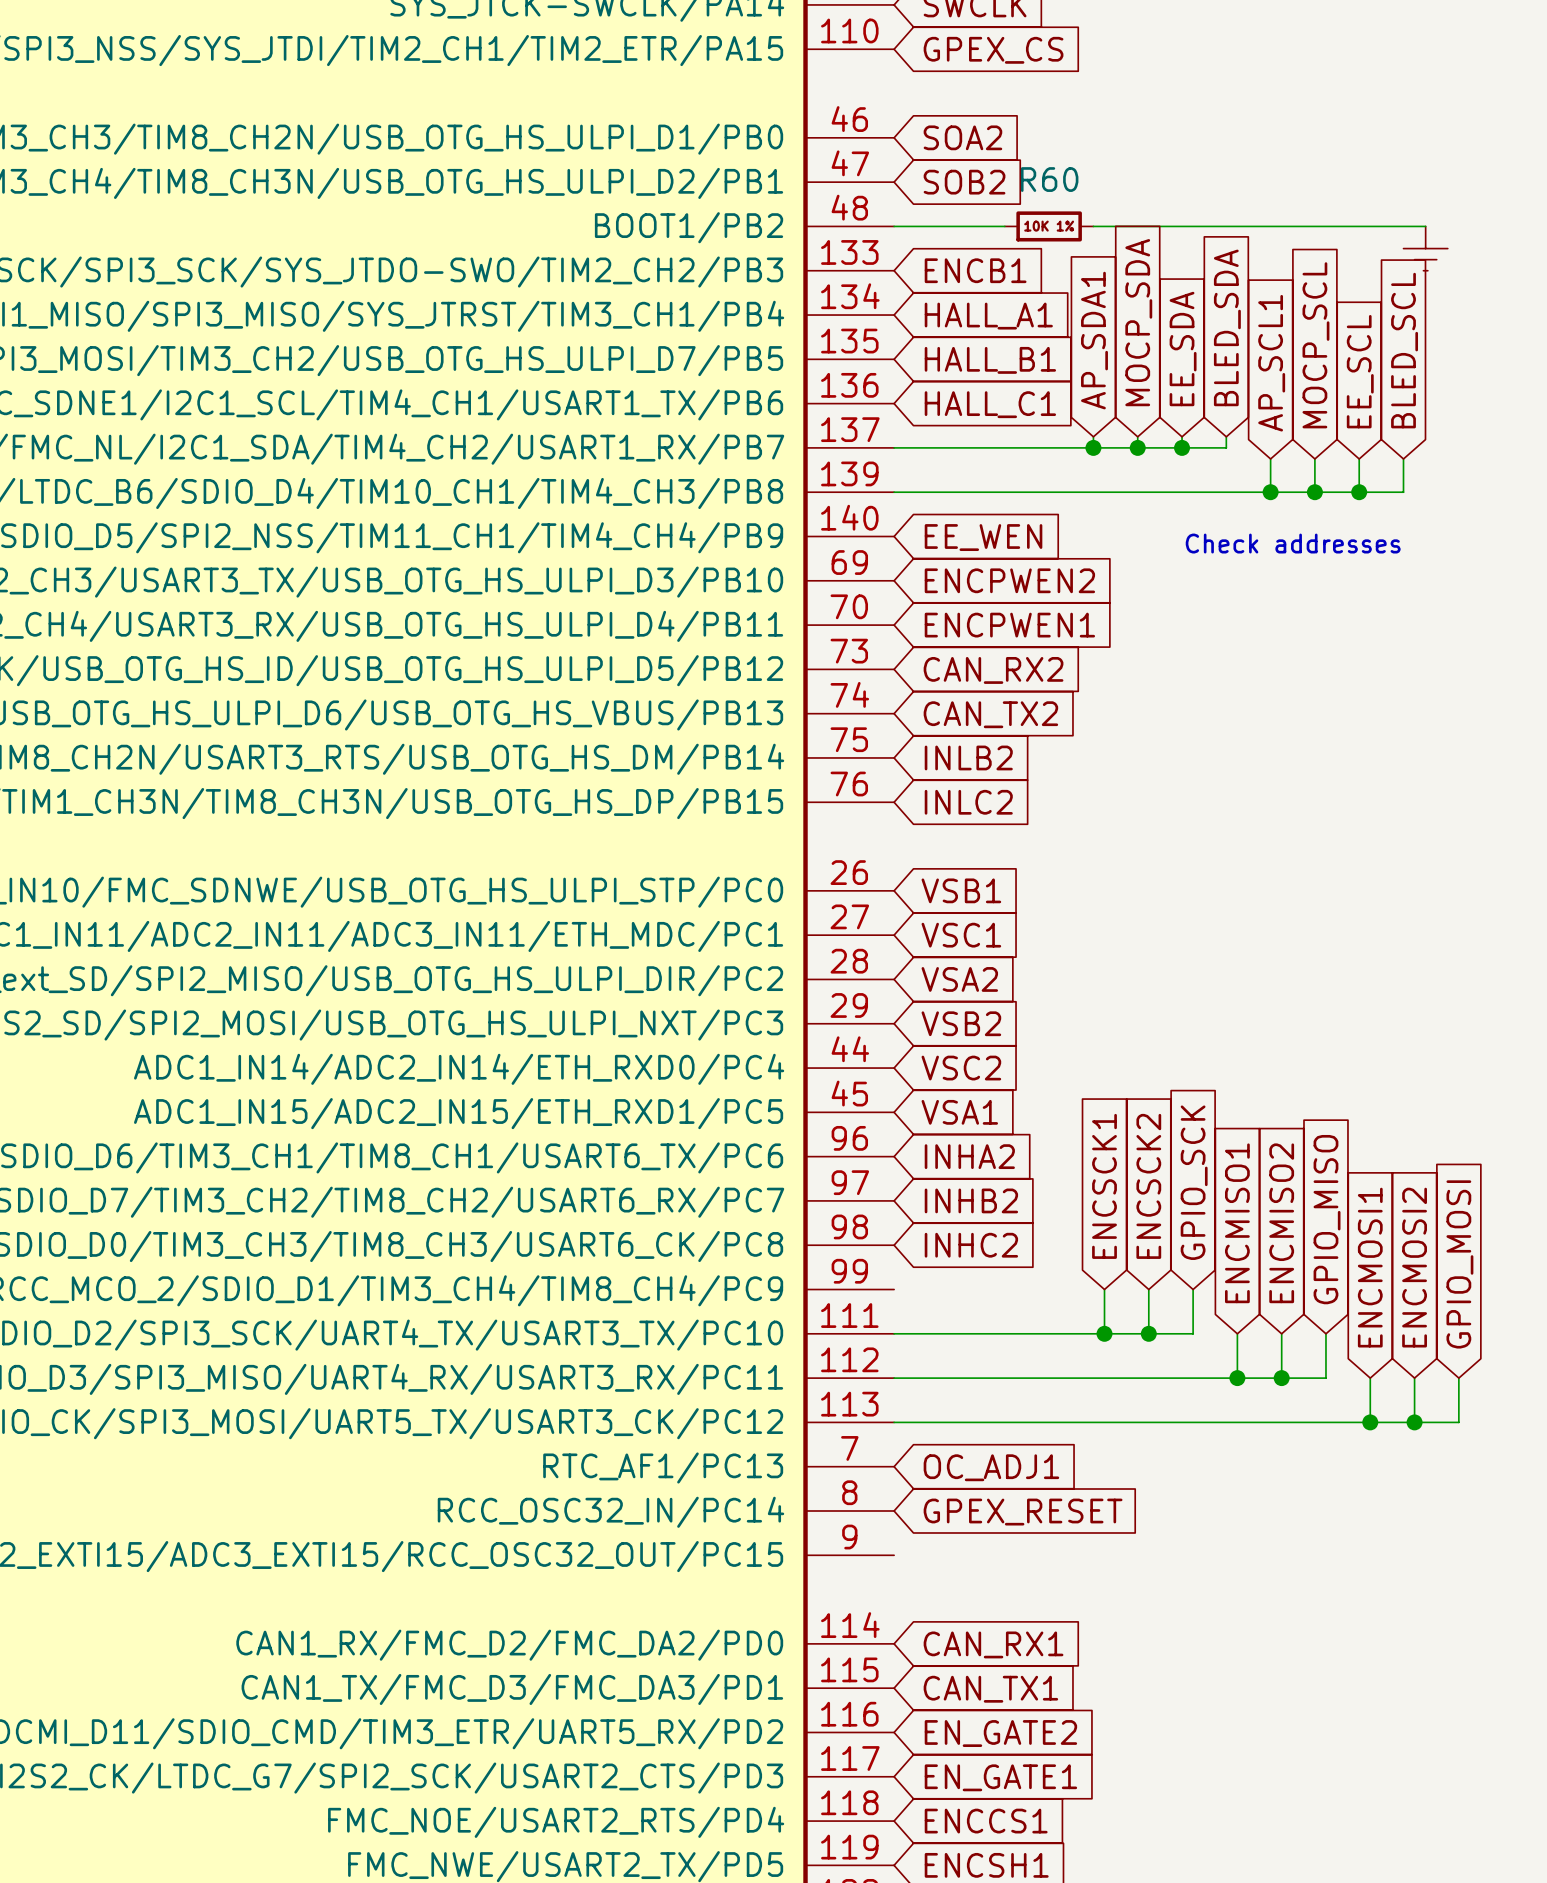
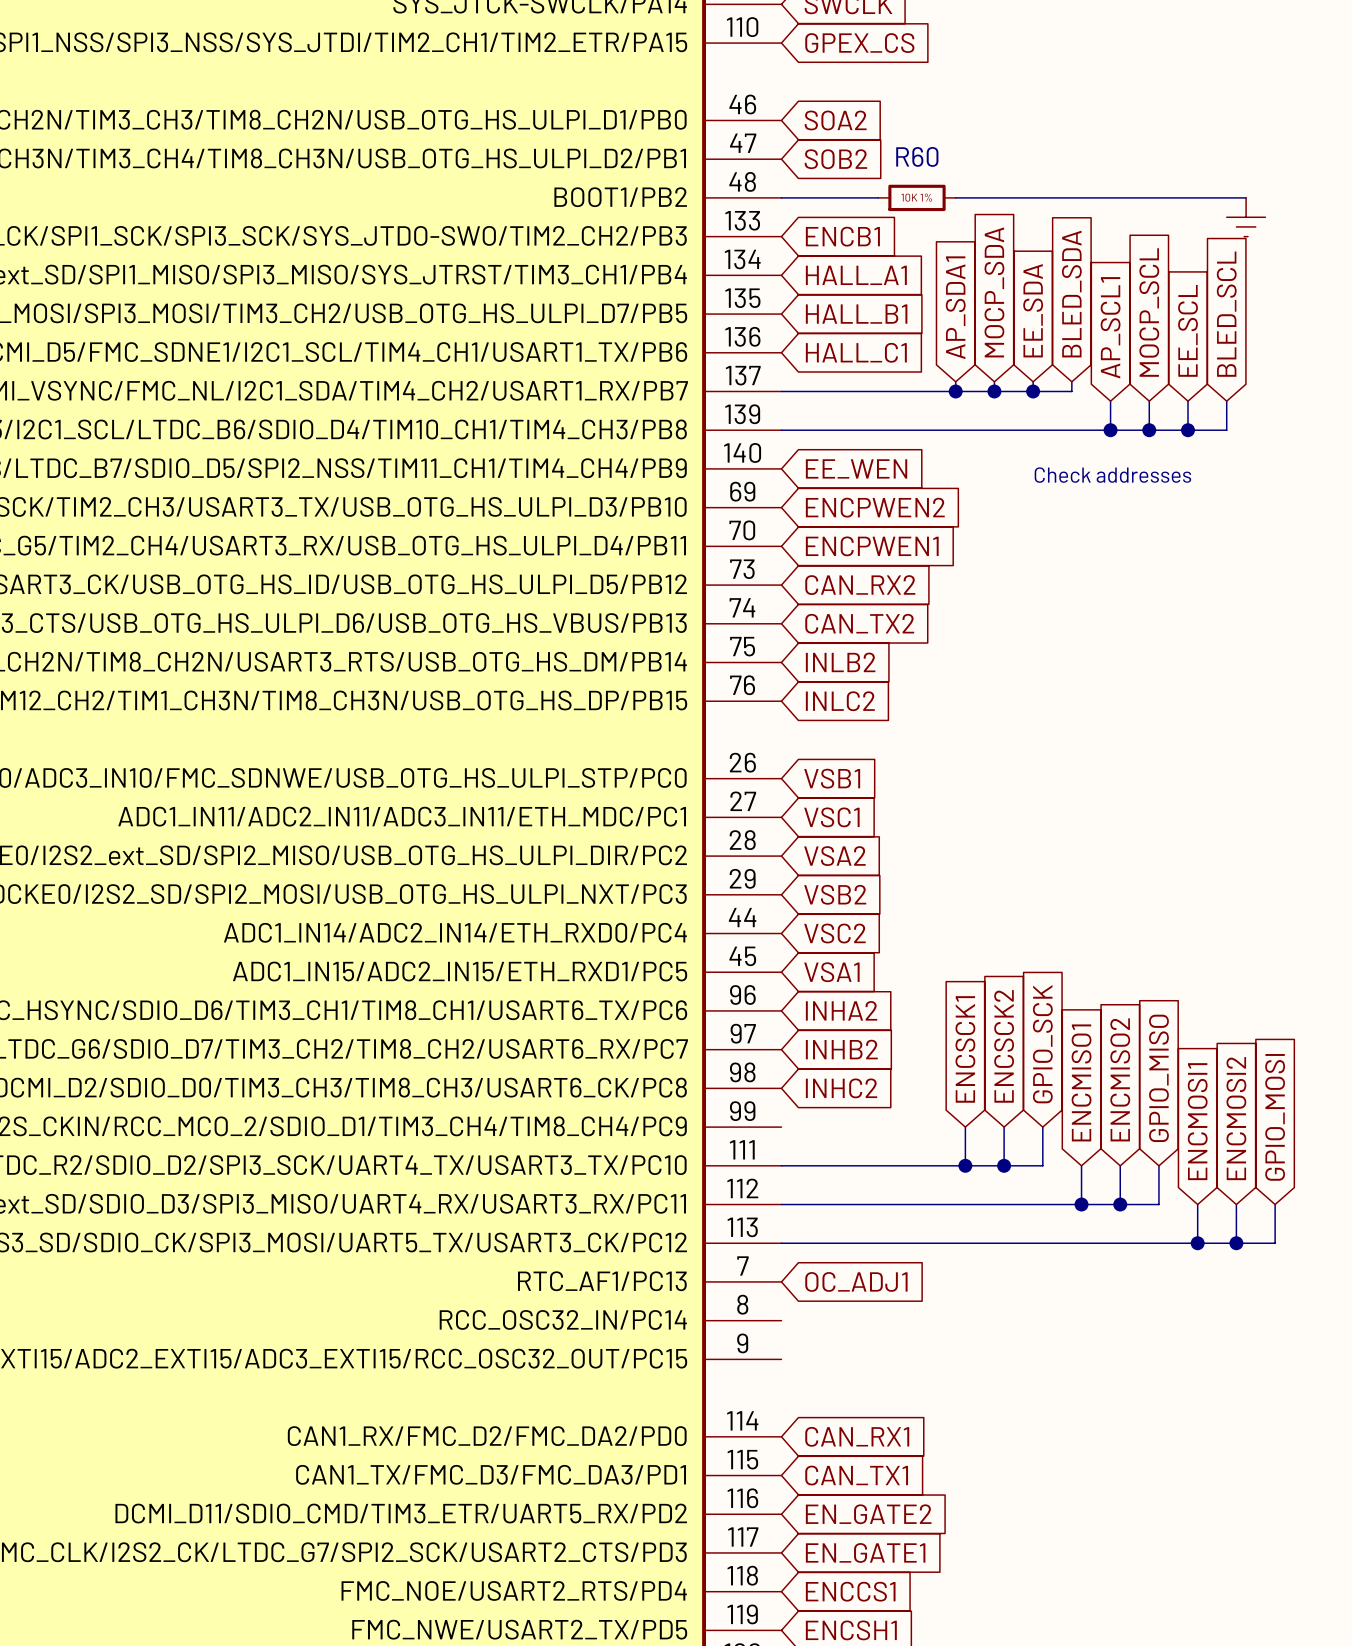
global label: GPEX_RESET (1023, 1512) -> none

